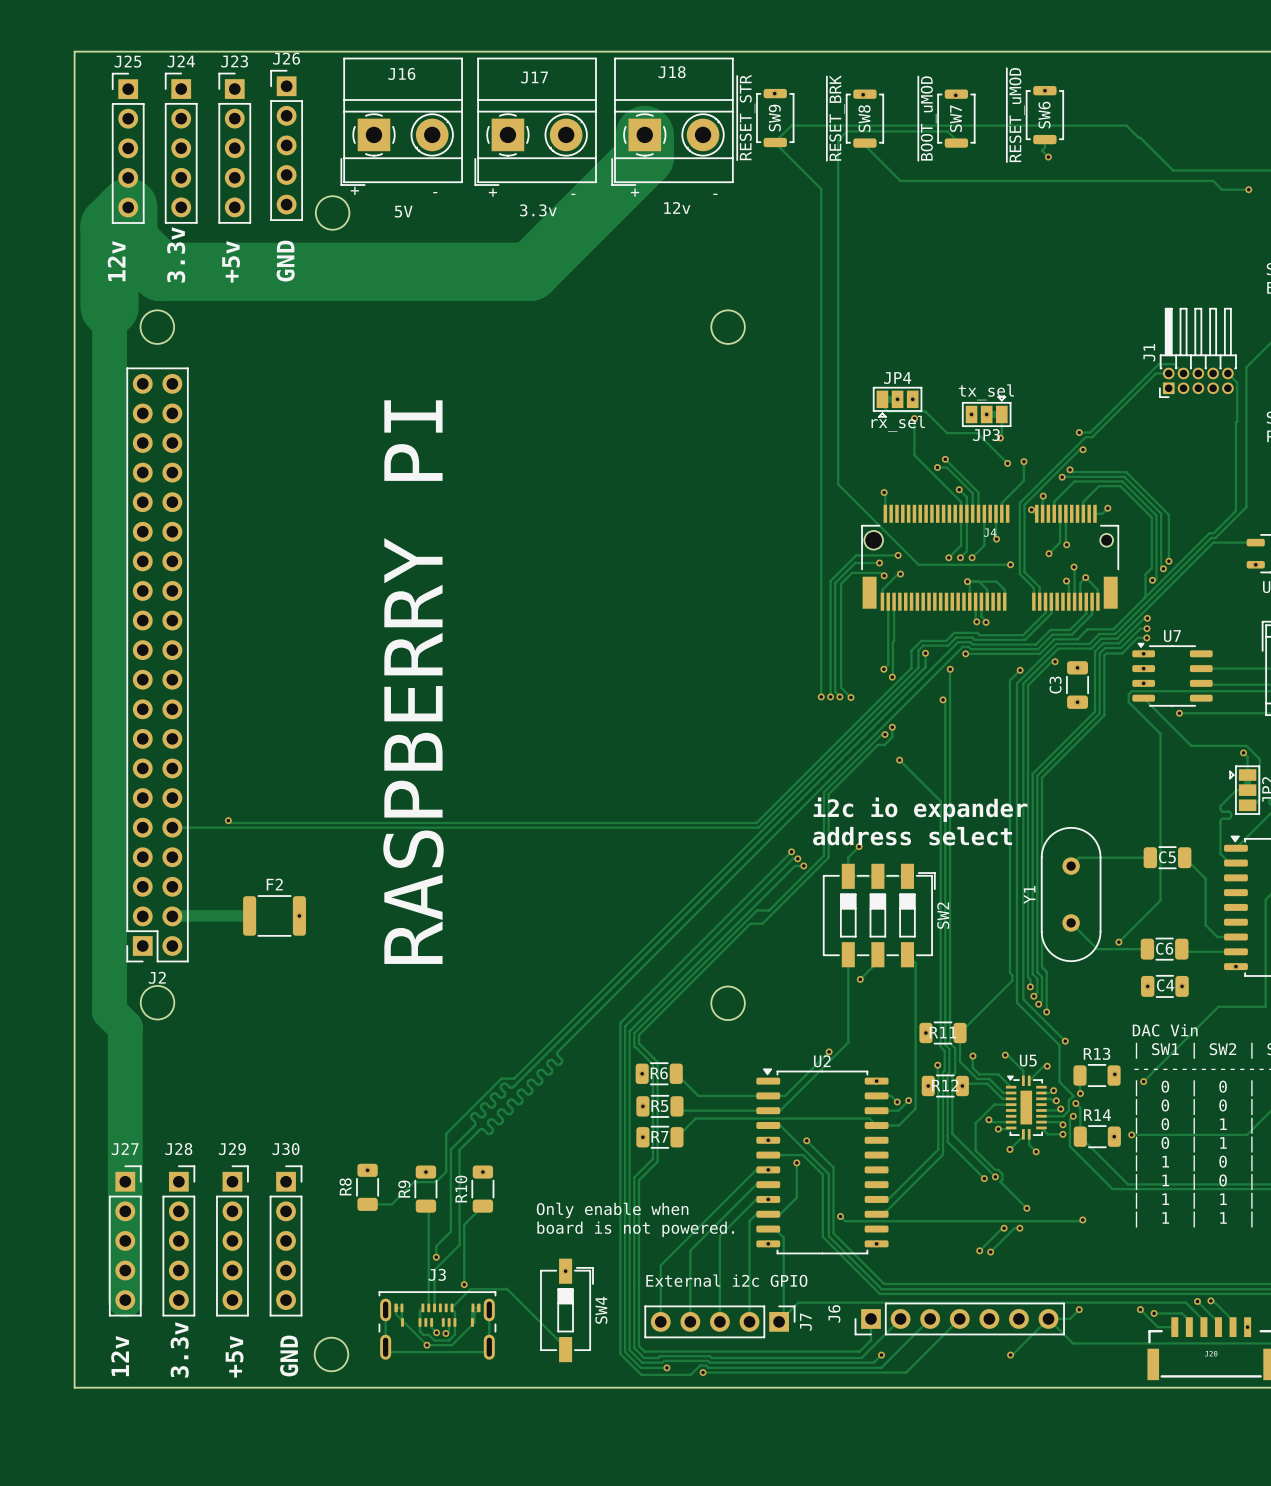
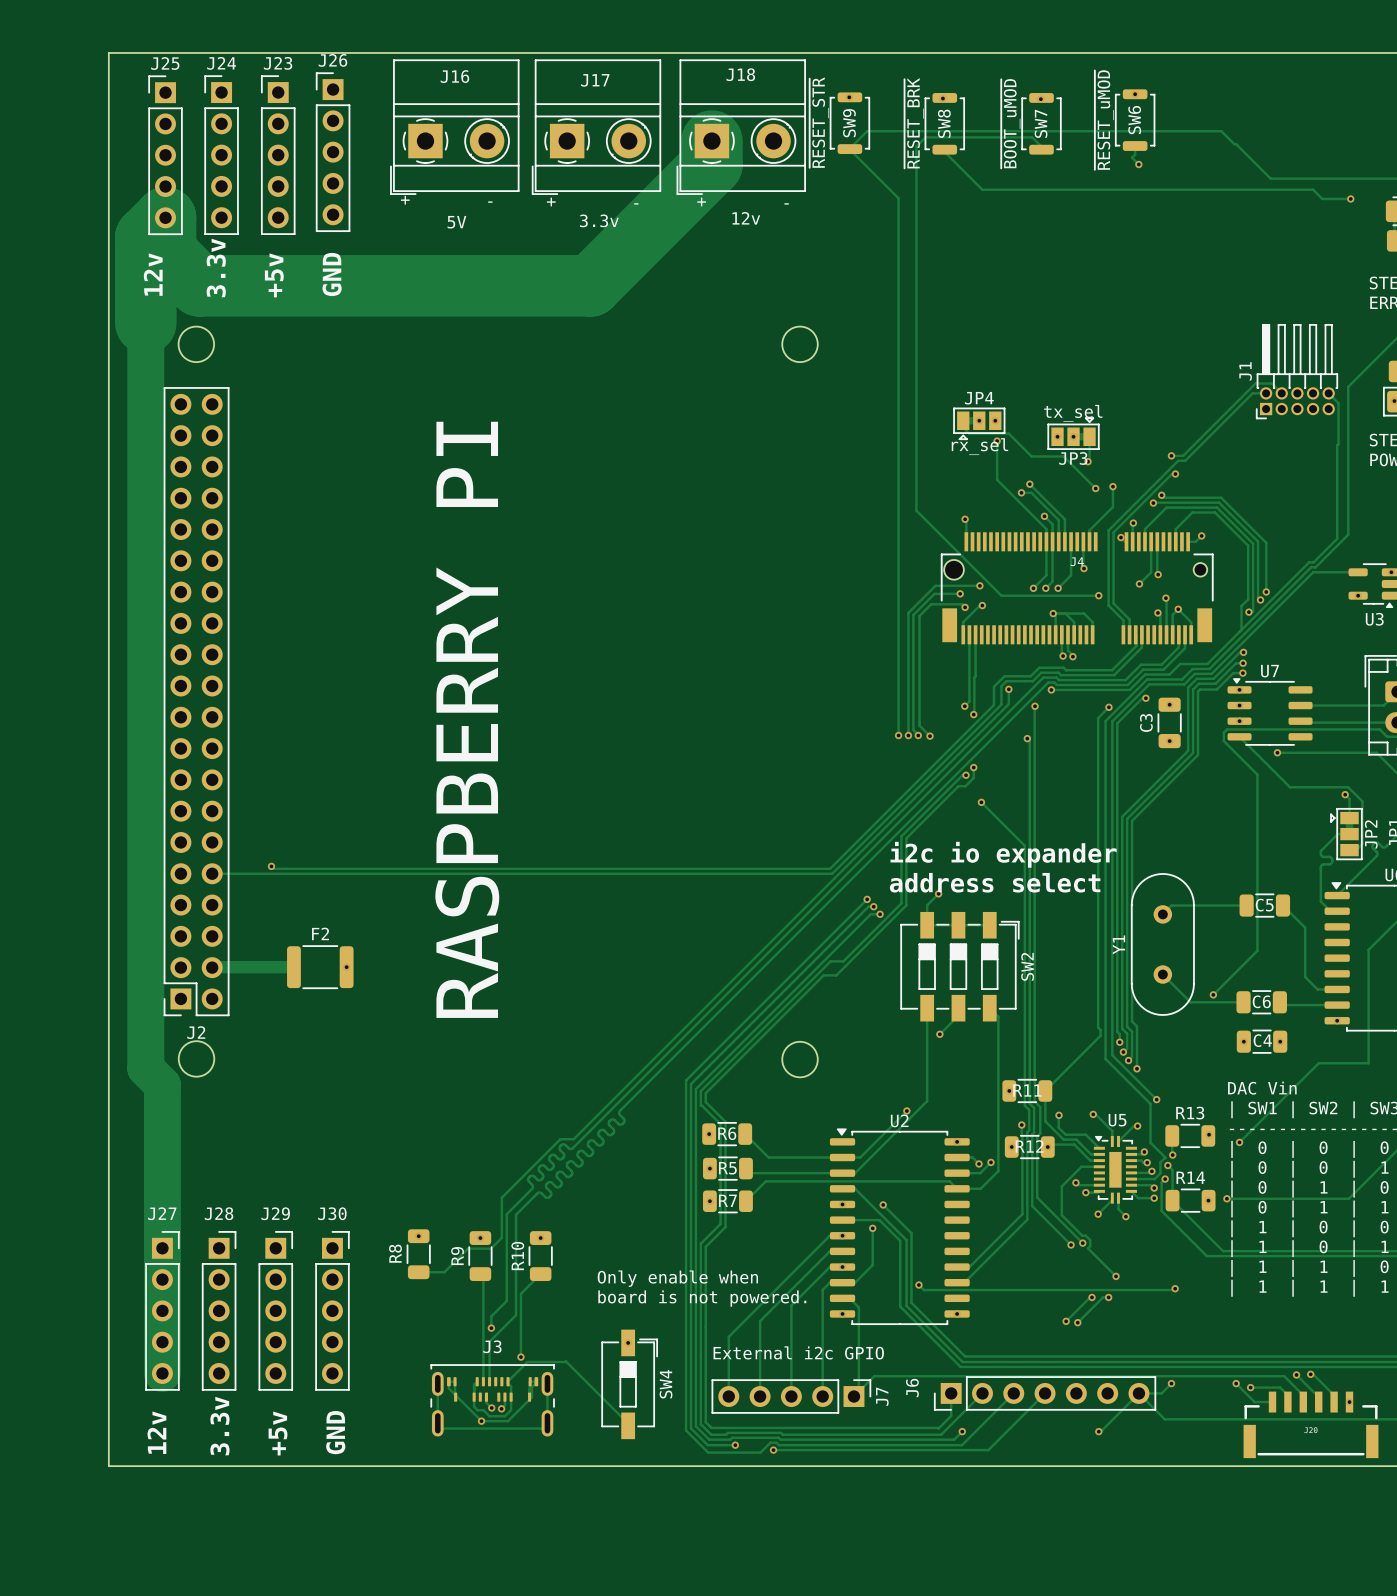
round board edge: [315, 195, 350, 231] -> none
round board edge: [314, 1337, 349, 1372] -> none

